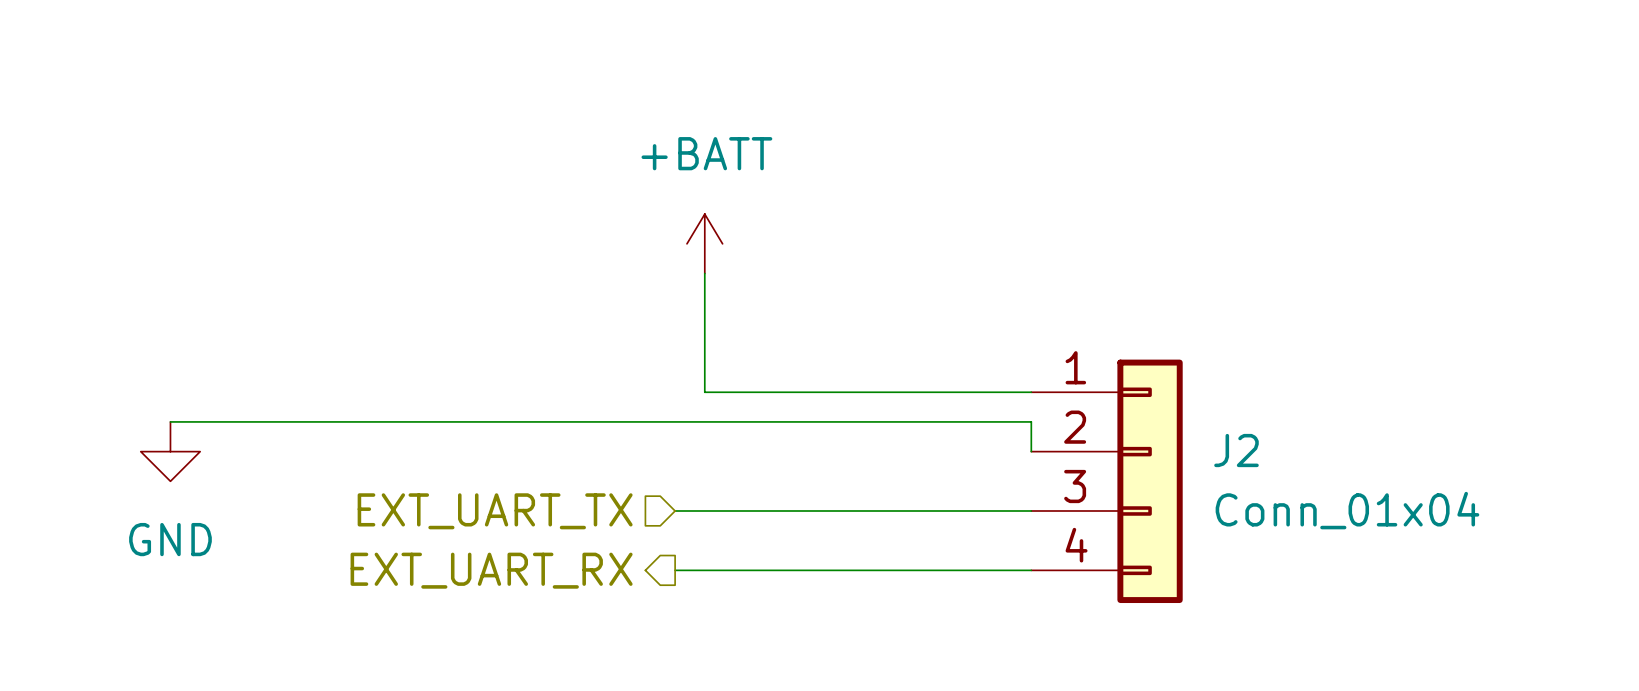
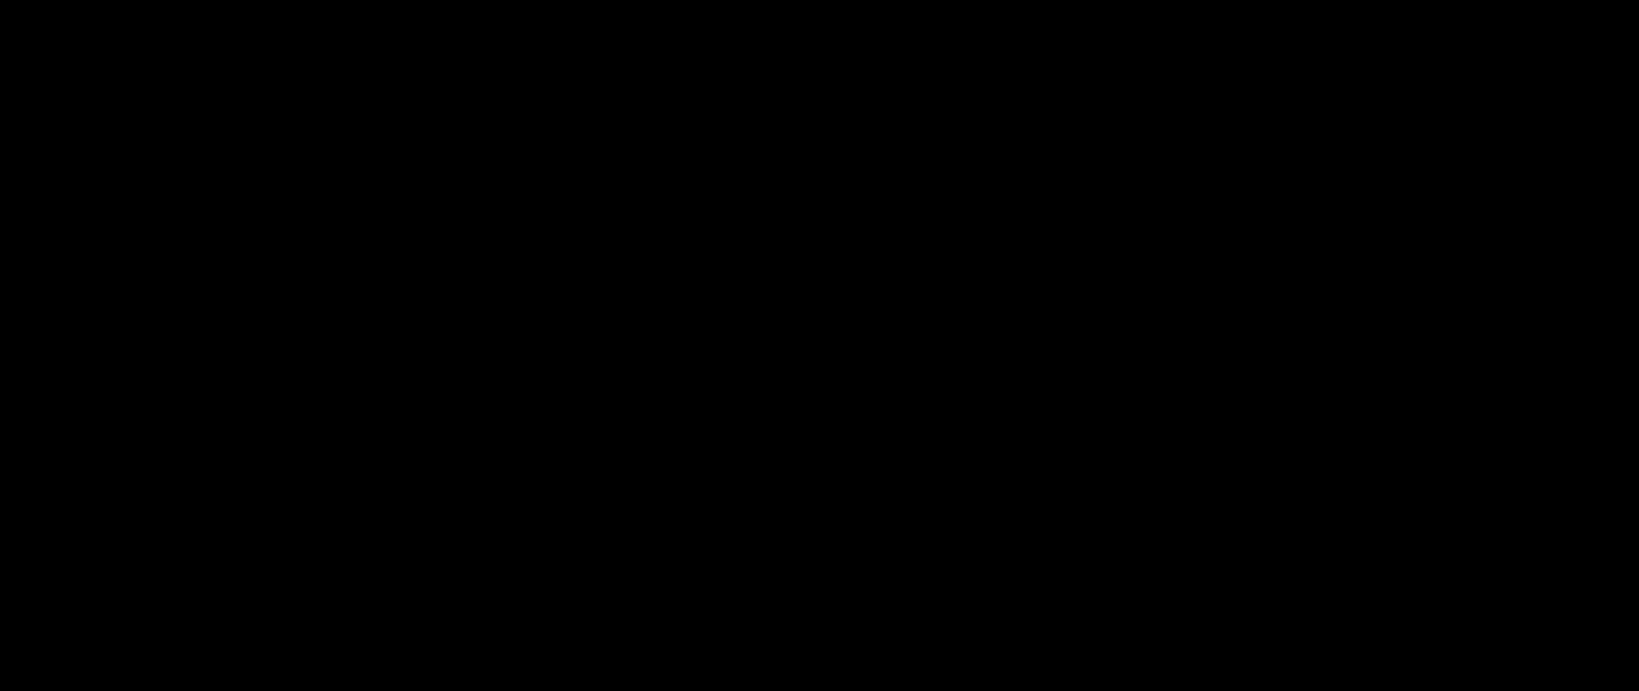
power symbol: +BATT (704, 243) -> none
wire: (704, 273) (704, 392) (1031, 392) -> none
wire: (170, 421) (1031, 421) (1031, 451) -> none
power symbol: GND (170, 451) -> none
J2: Conn_01x04 (1107, 481) -> none
wire: (675, 510) (1031, 510) -> none
hierarchical label: EXT_UART_TX (495, 511) -> none
hierarchical label: EXT_UART_RX (491, 570) -> none
wire: (675, 570) (1031, 570) -> none

